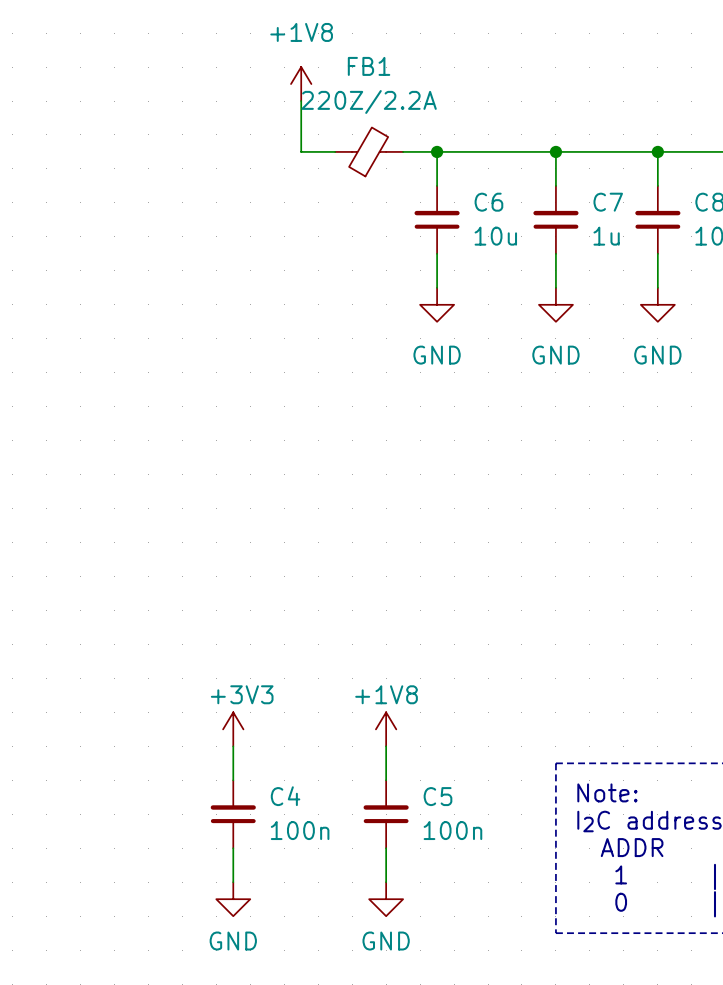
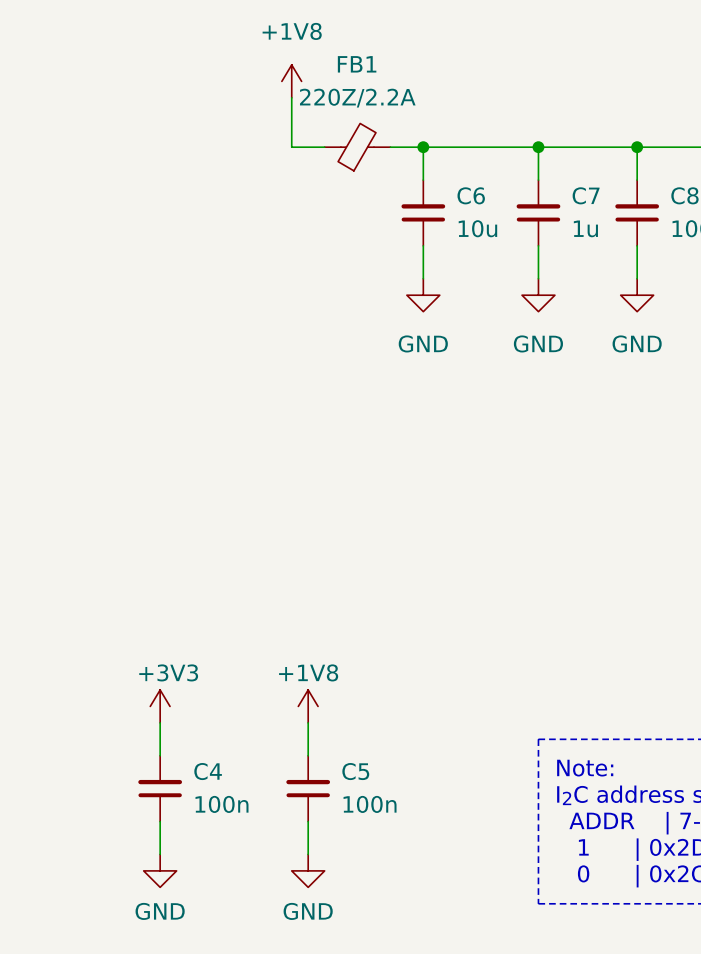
power symbol position: +3V3 (233, 729) -> +3V3 (160, 706)
power symbol position: +1V8 (386, 729) -> +1V8 (308, 706)
wire: (233, 746) (233, 780) -> (160, 722) (160, 755)
wire: (386, 746) (386, 780) -> (308, 722) (308, 755)
C4 position: (233, 814) -> (160, 788)
C5 position: (386, 814) -> (308, 788)
wire: (233, 848) (233, 882) -> (160, 821) (160, 854)
wire: (386, 848) (386, 882) -> (308, 821) (308, 854)
power symbol: none -> GND (160, 870)
power symbol: GND (233, 899) -> none
power symbol: none -> GND (308, 870)
power symbol: GND (386, 899) -> none

